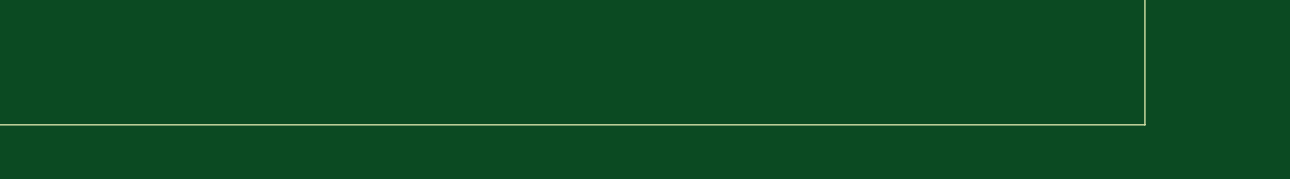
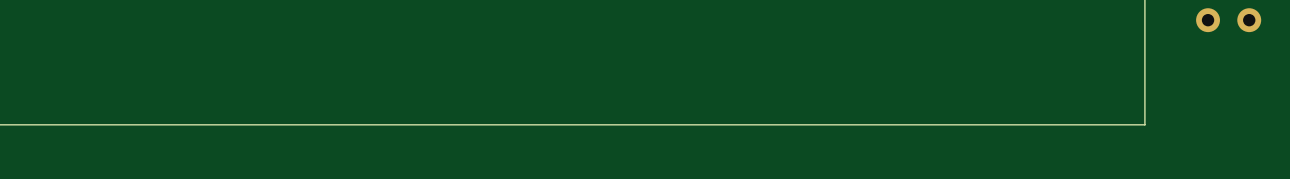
part: none -> (1228, 20)

